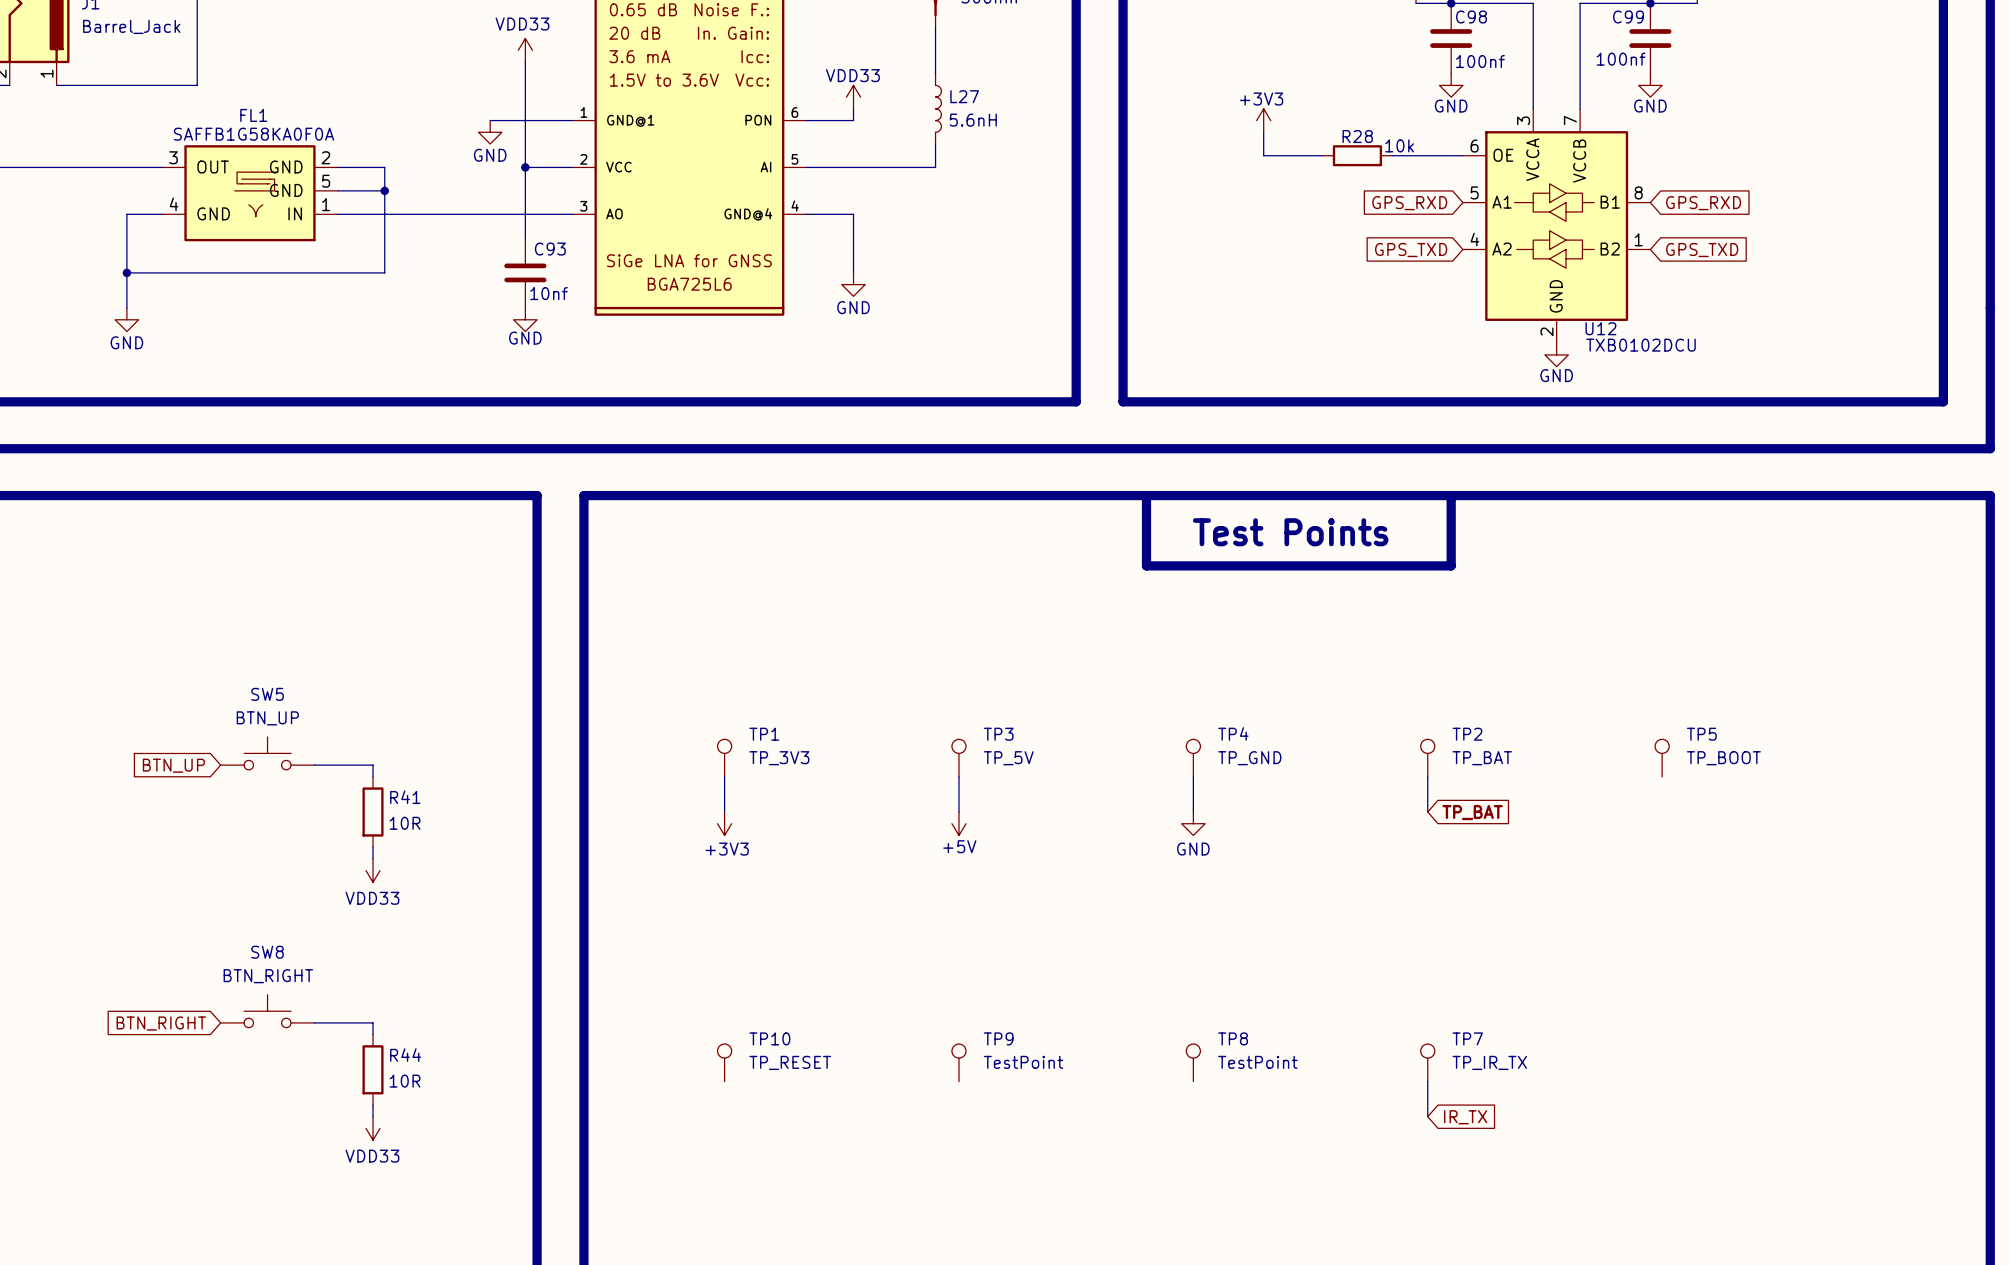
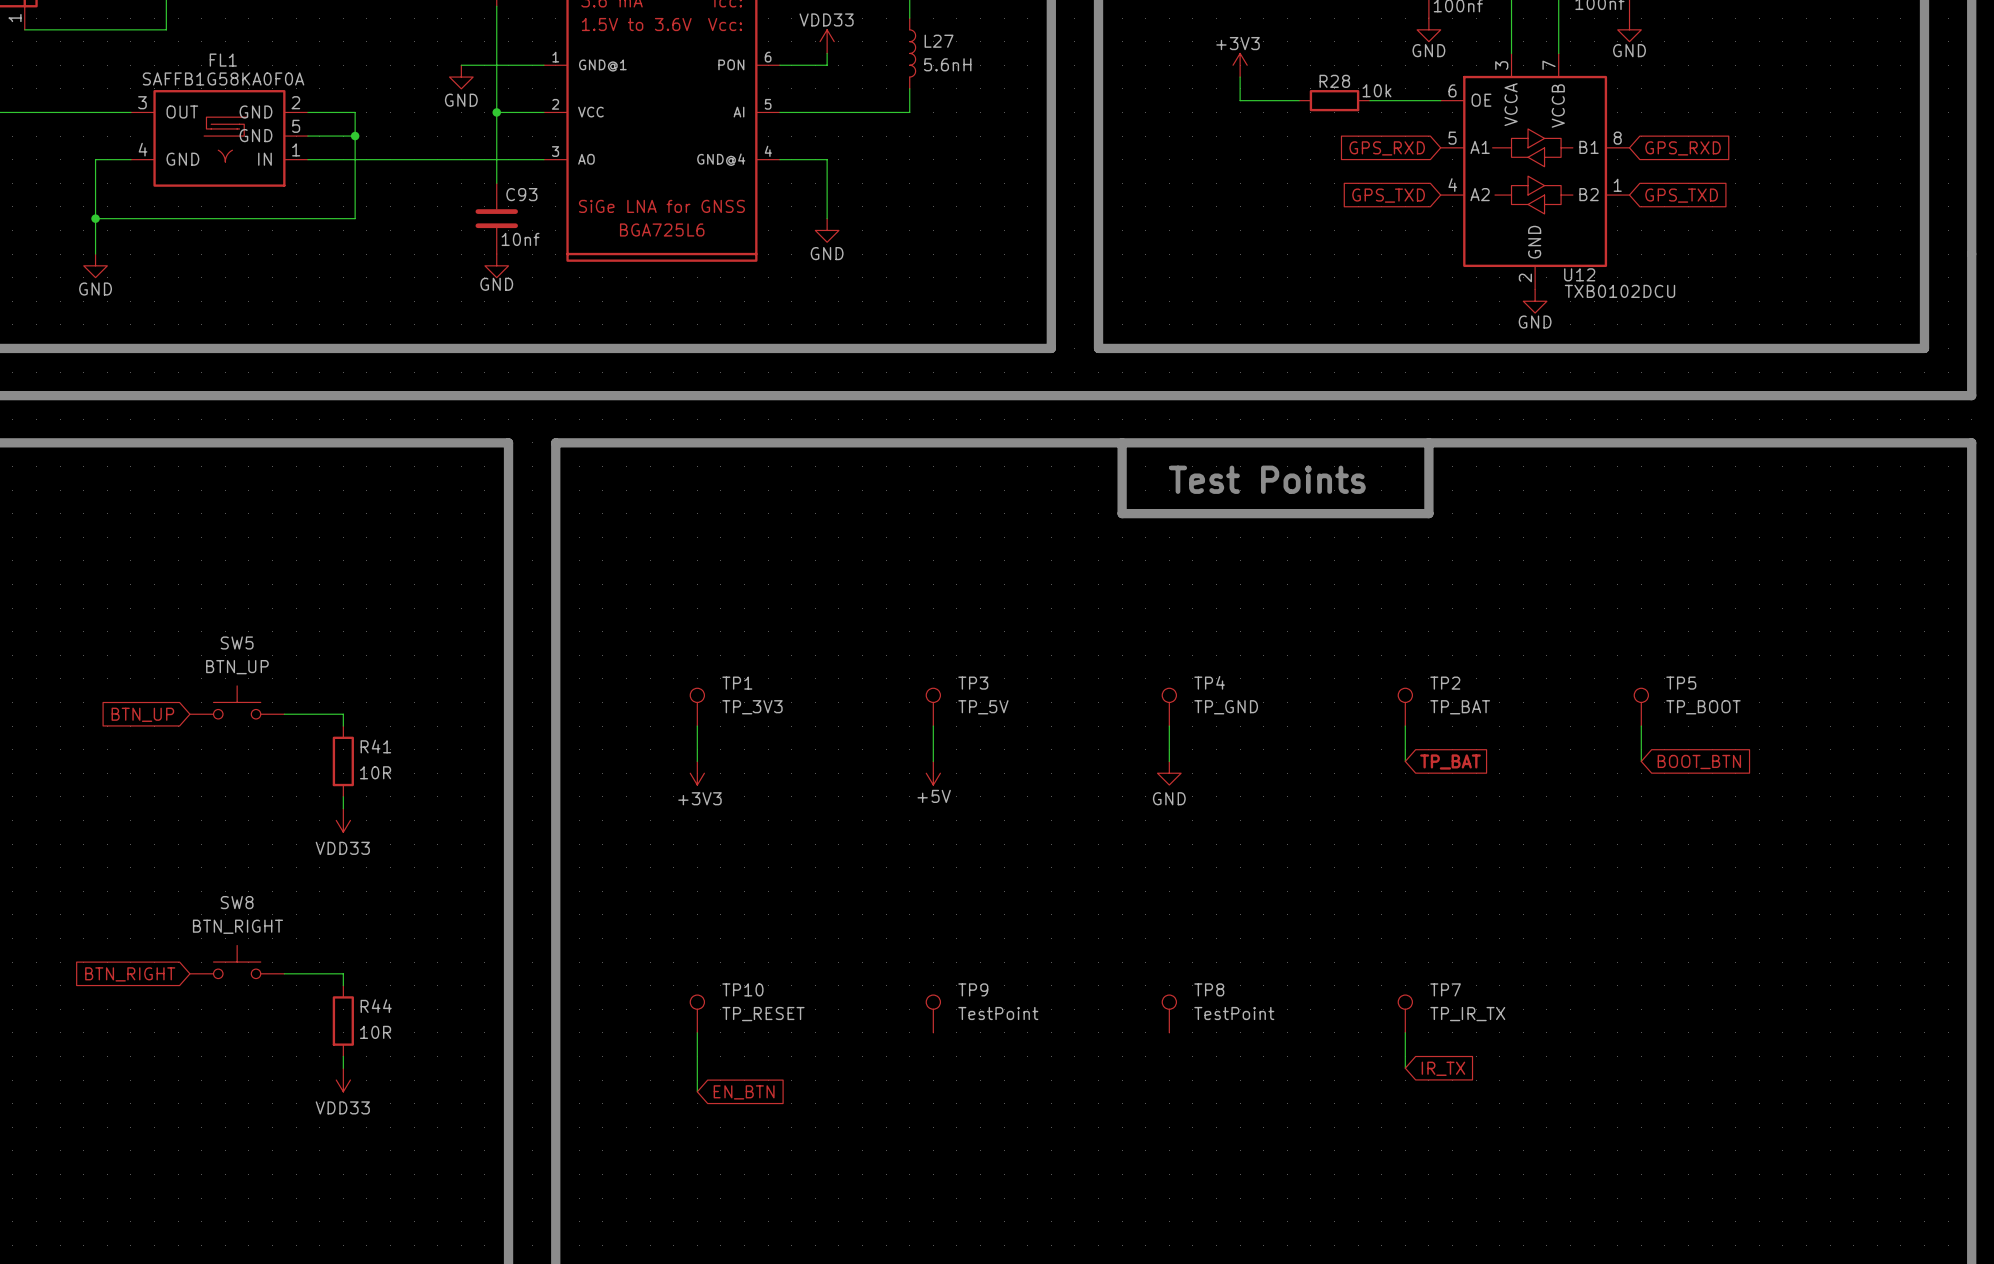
wire: none -> (1641, 726) (1641, 761)
global label: none -> BOOT_BTN (1699, 761)
wire: none -> (697, 1032) (697, 1091)
global label: none -> EN_BTN (744, 1092)

